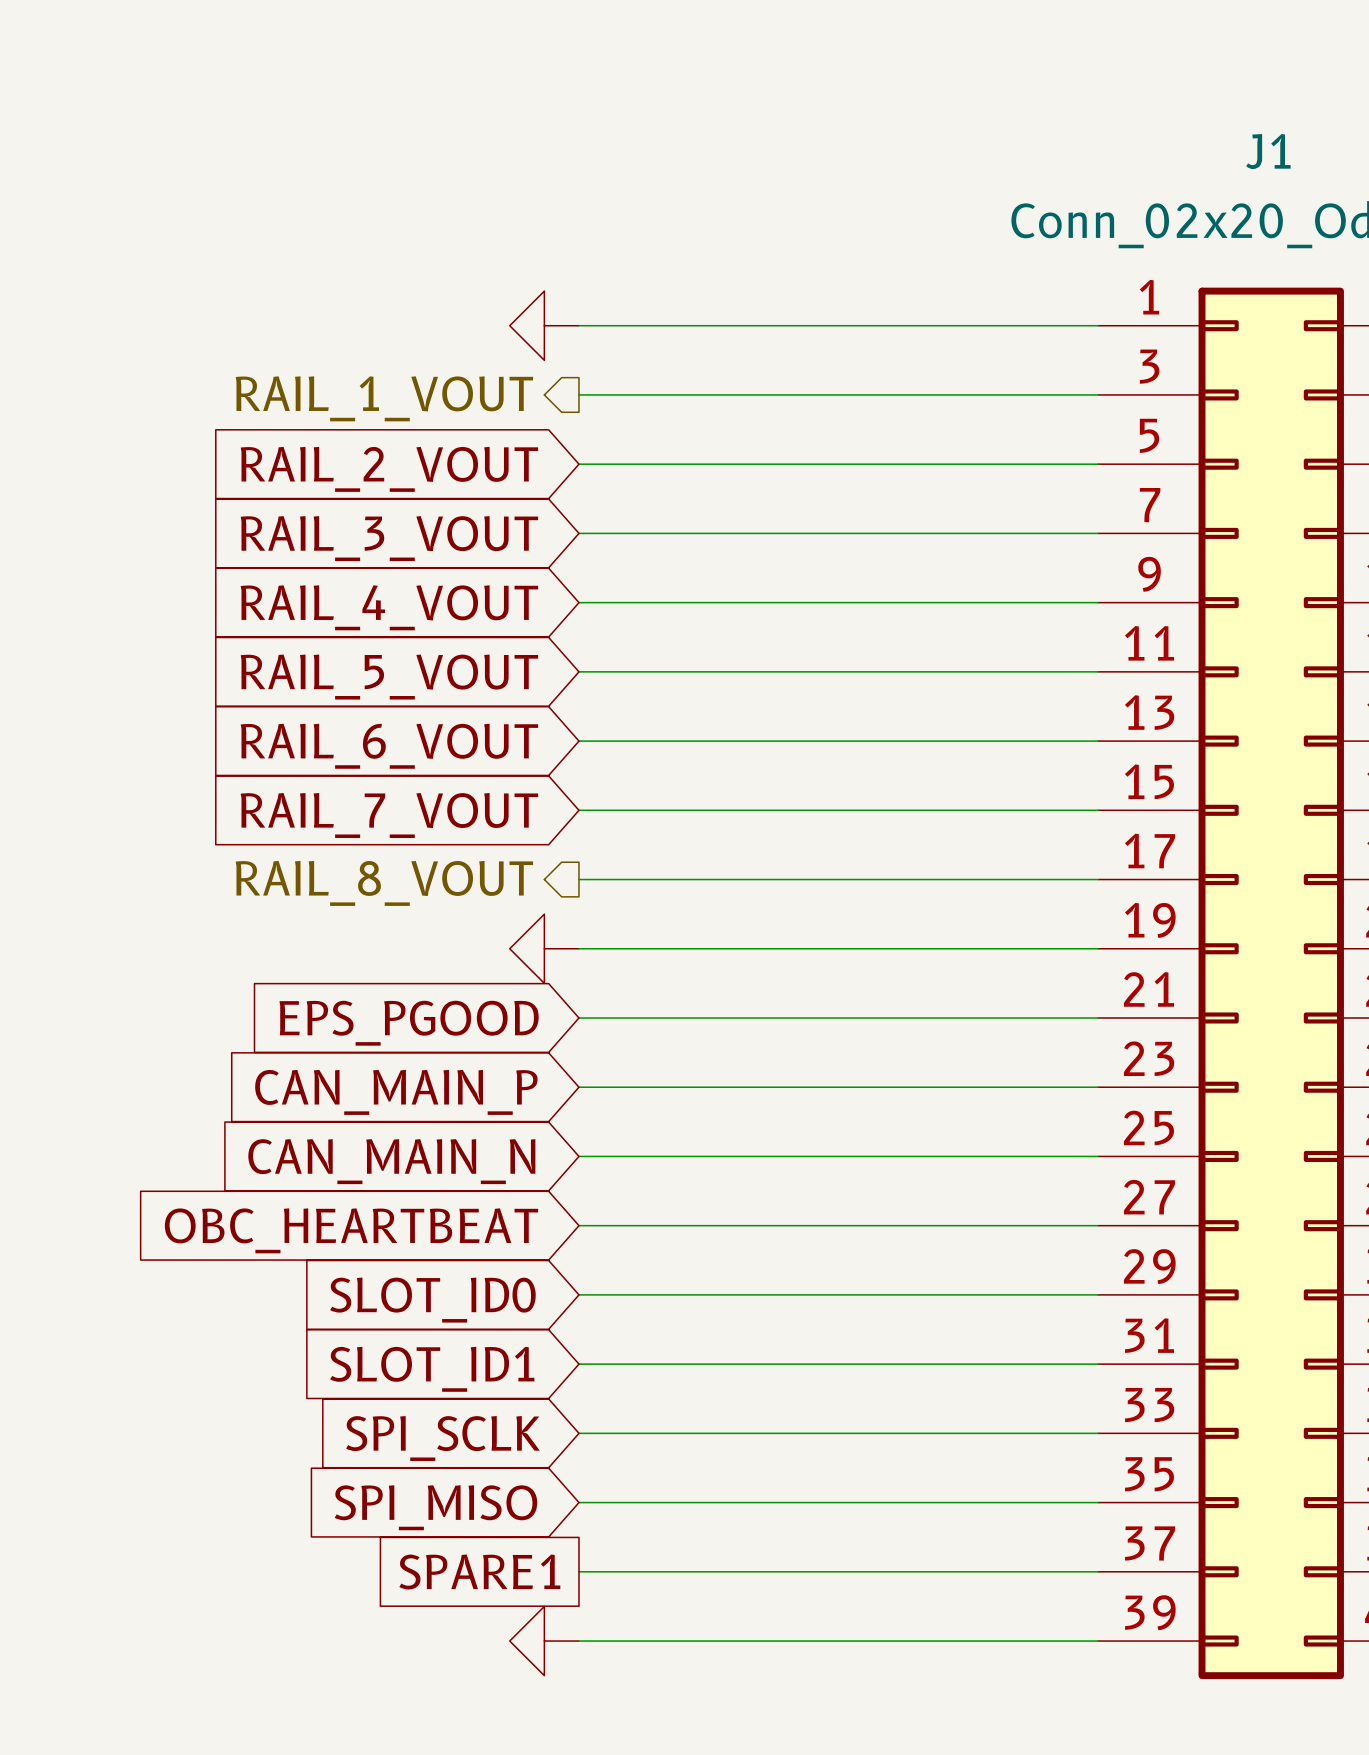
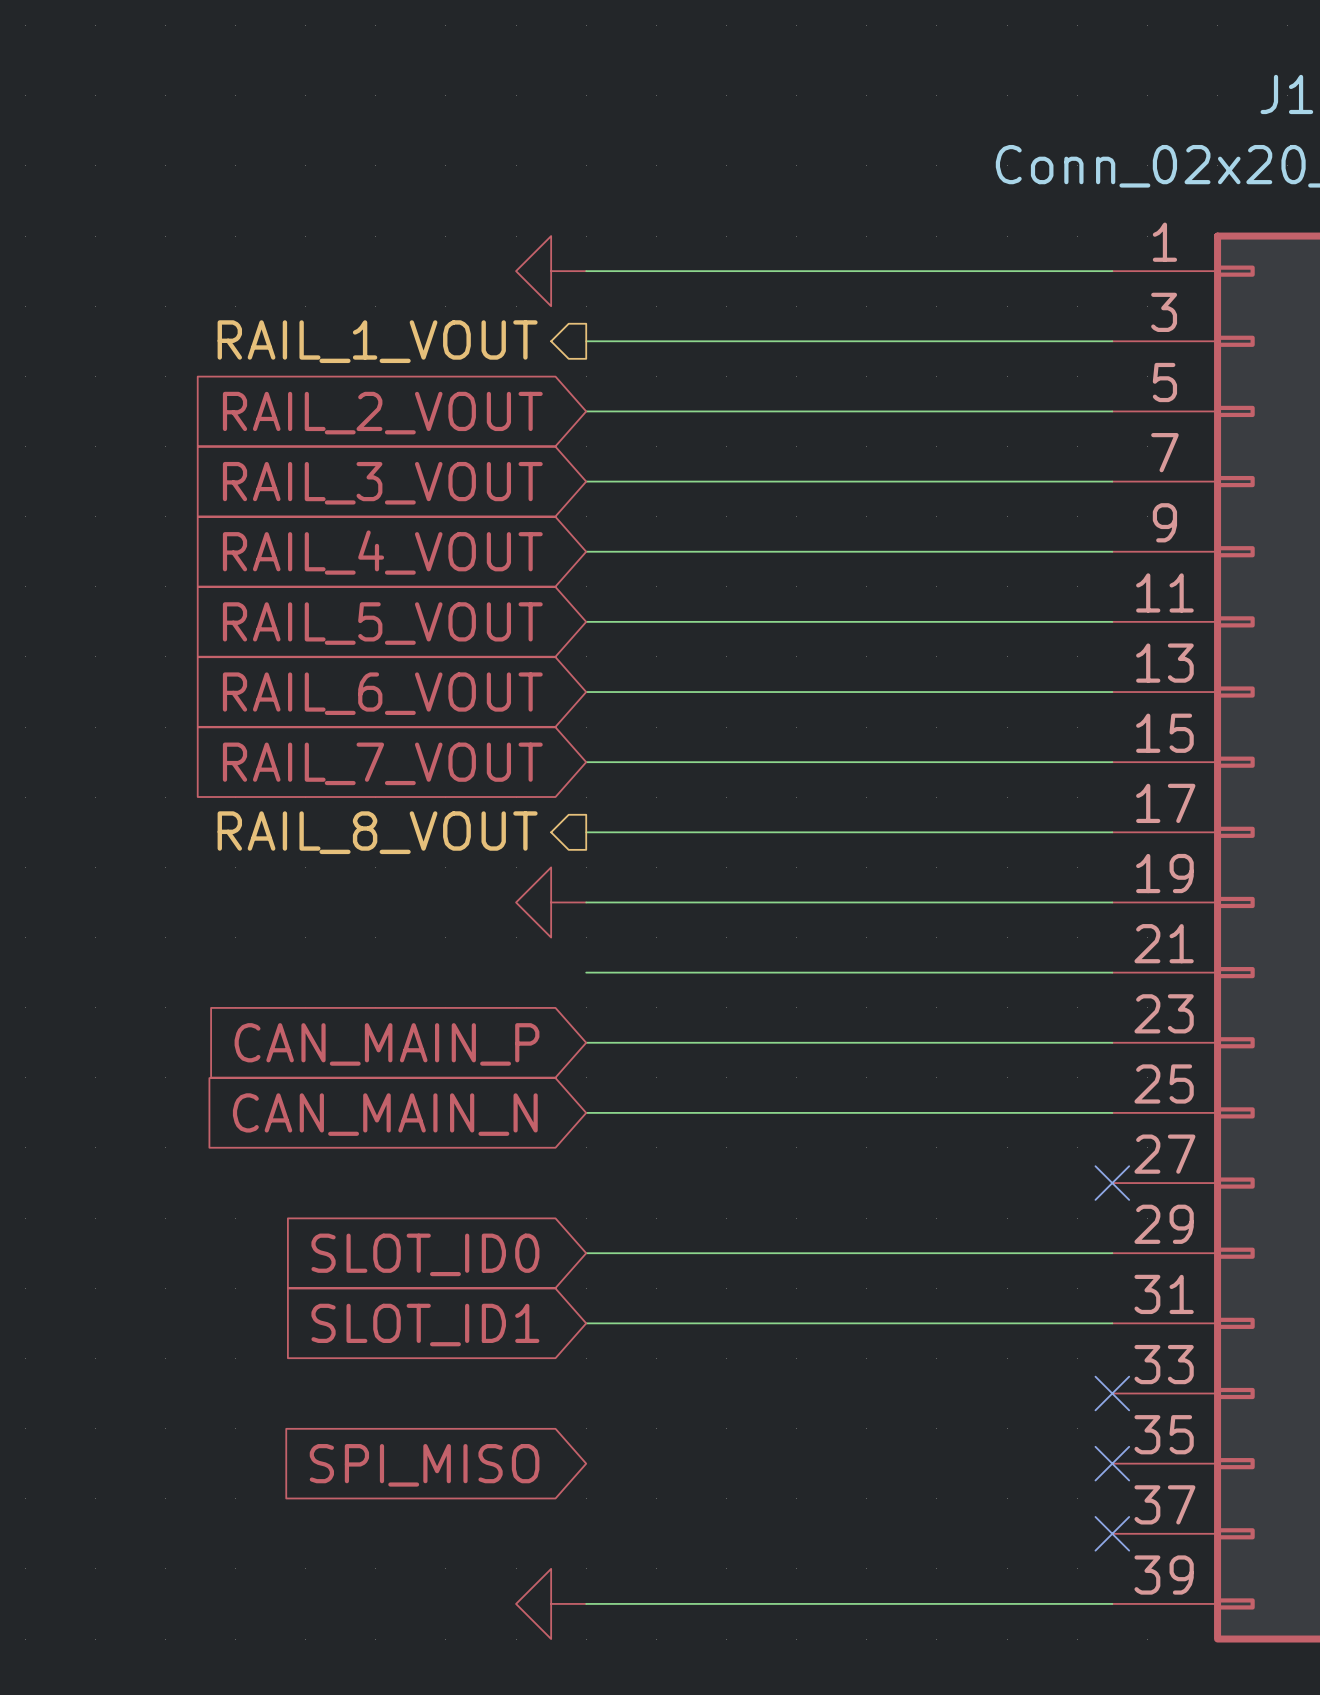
global label: EPS_PGOOD (409, 1023) -> none
wire: (578, 1225) (1098, 1225) -> none
no-connect mark: none -> (1112, 1183)
global label: OBC_HEARTBEAT (351, 1230) -> none
wire: (578, 1433) (1098, 1433) -> none
no-connect mark: none -> (1112, 1393)
global label: SPI_SCLK (442, 1438) -> none
wire: (578, 1502) (1098, 1502) -> none
no-connect mark: none -> (1112, 1463)
global label: SPARE1 (479, 1571) -> none
wire: (578, 1571) (1098, 1571) -> none
no-connect mark: none -> (1112, 1533)

